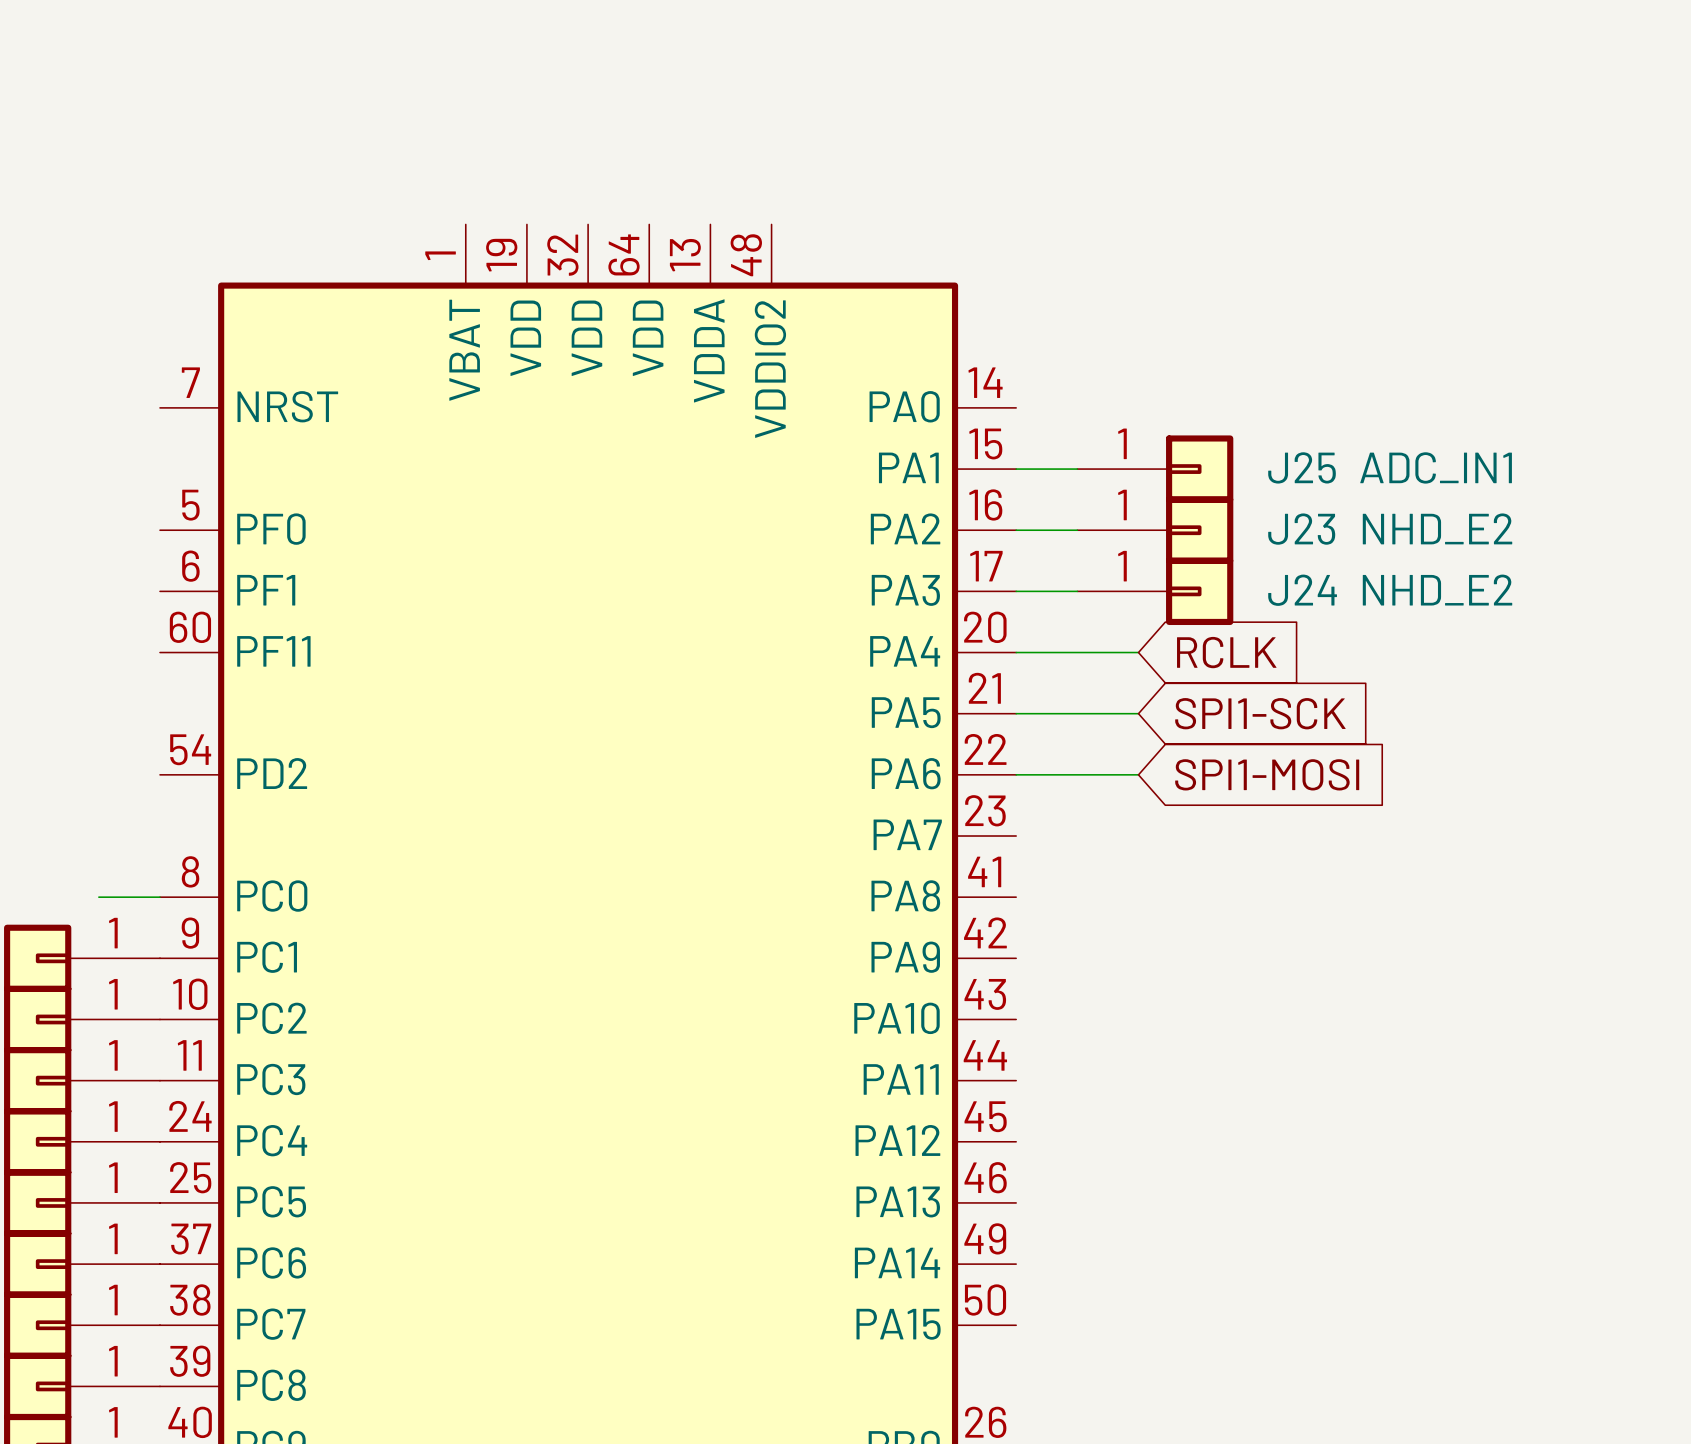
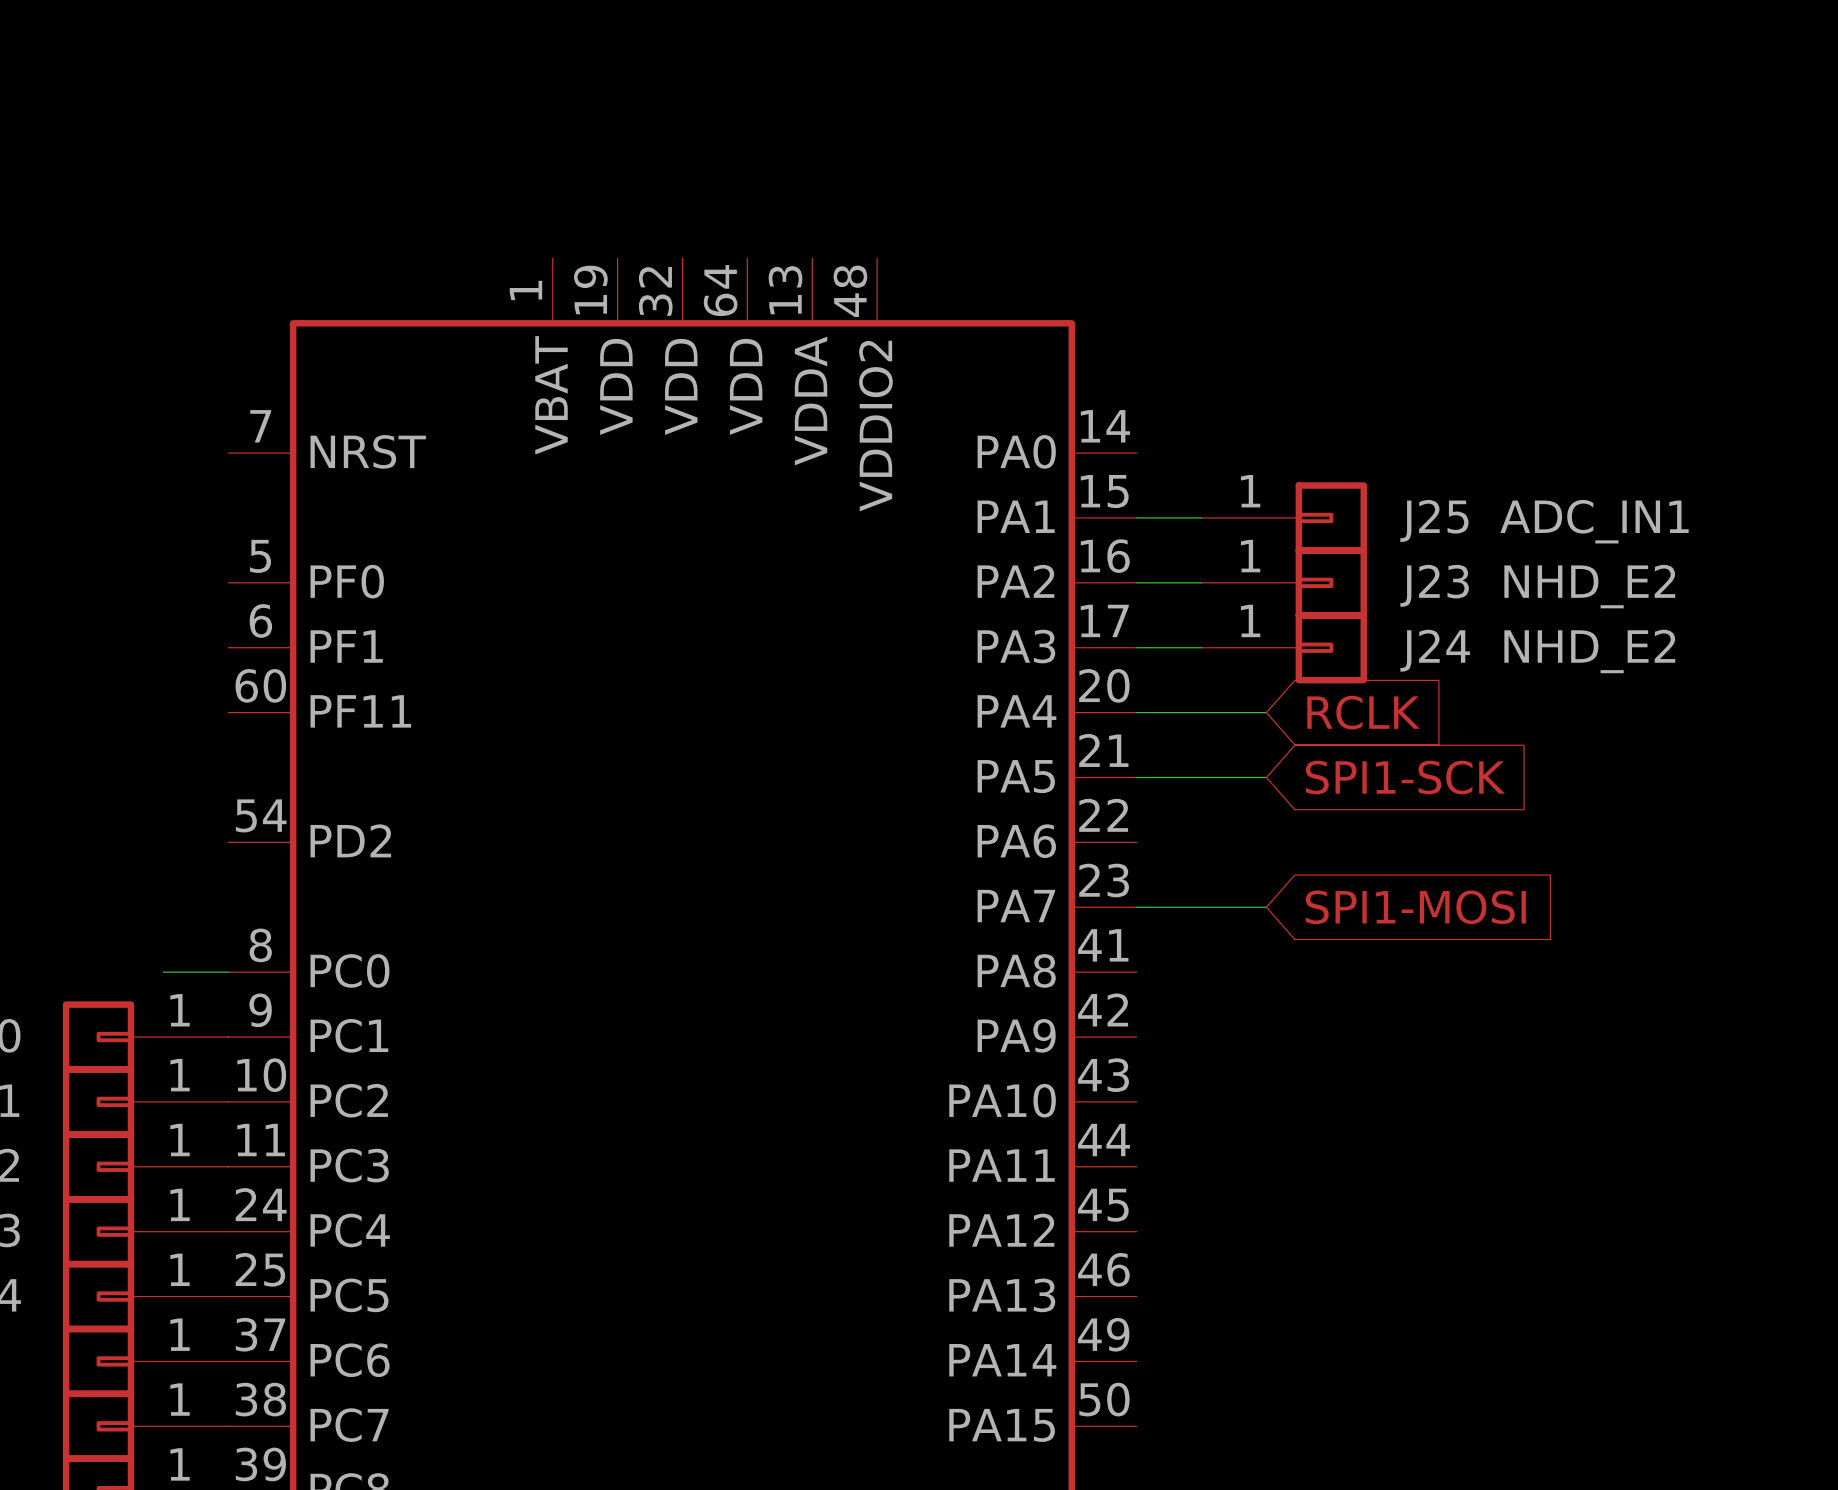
wire: (1016, 774) (1138, 774) -> (1136, 907) (1266, 907)
global label position: SPI1-MOSI (1267, 774) -> SPI1-MOSI (1415, 907)

